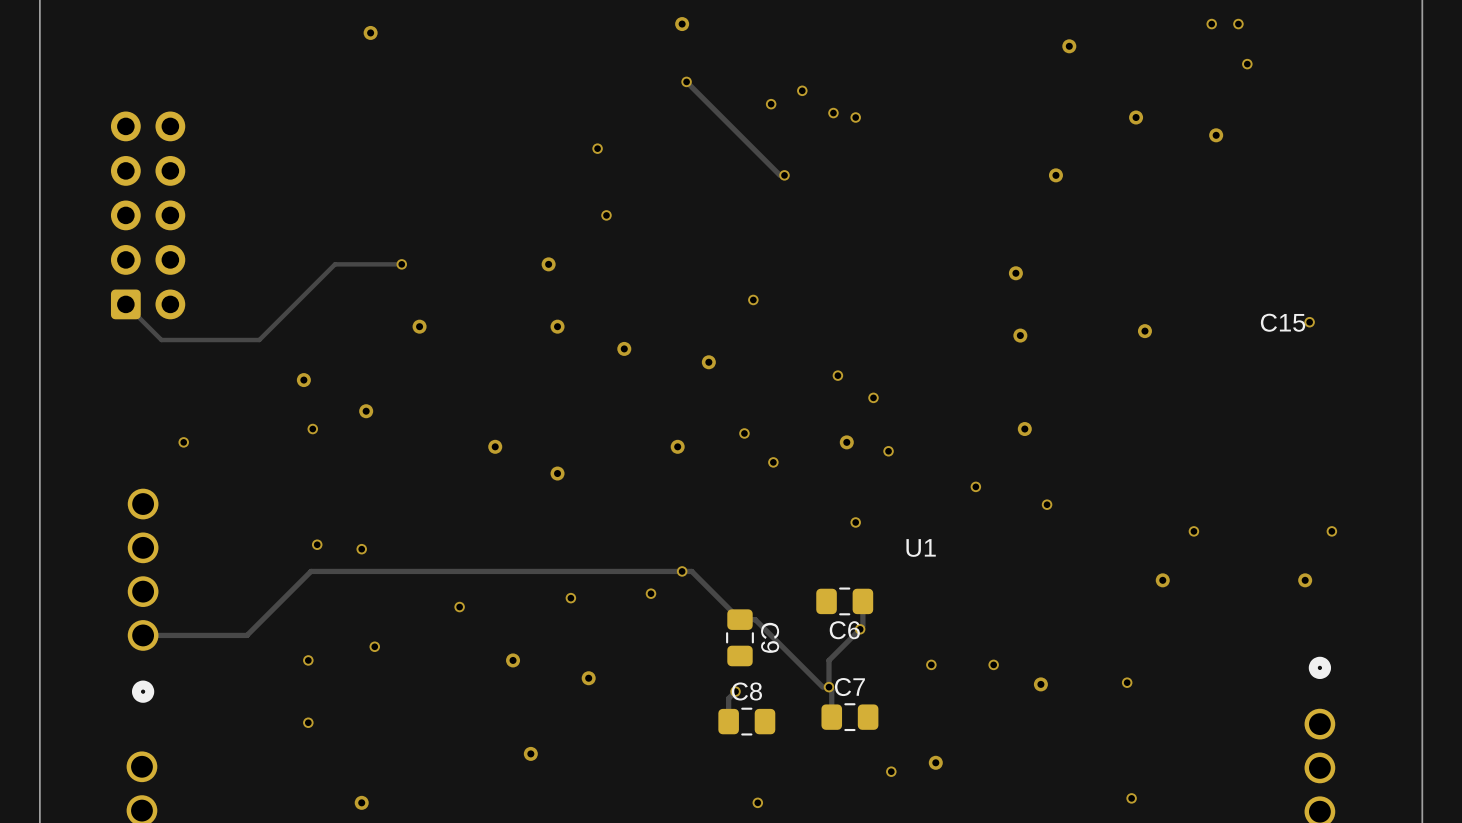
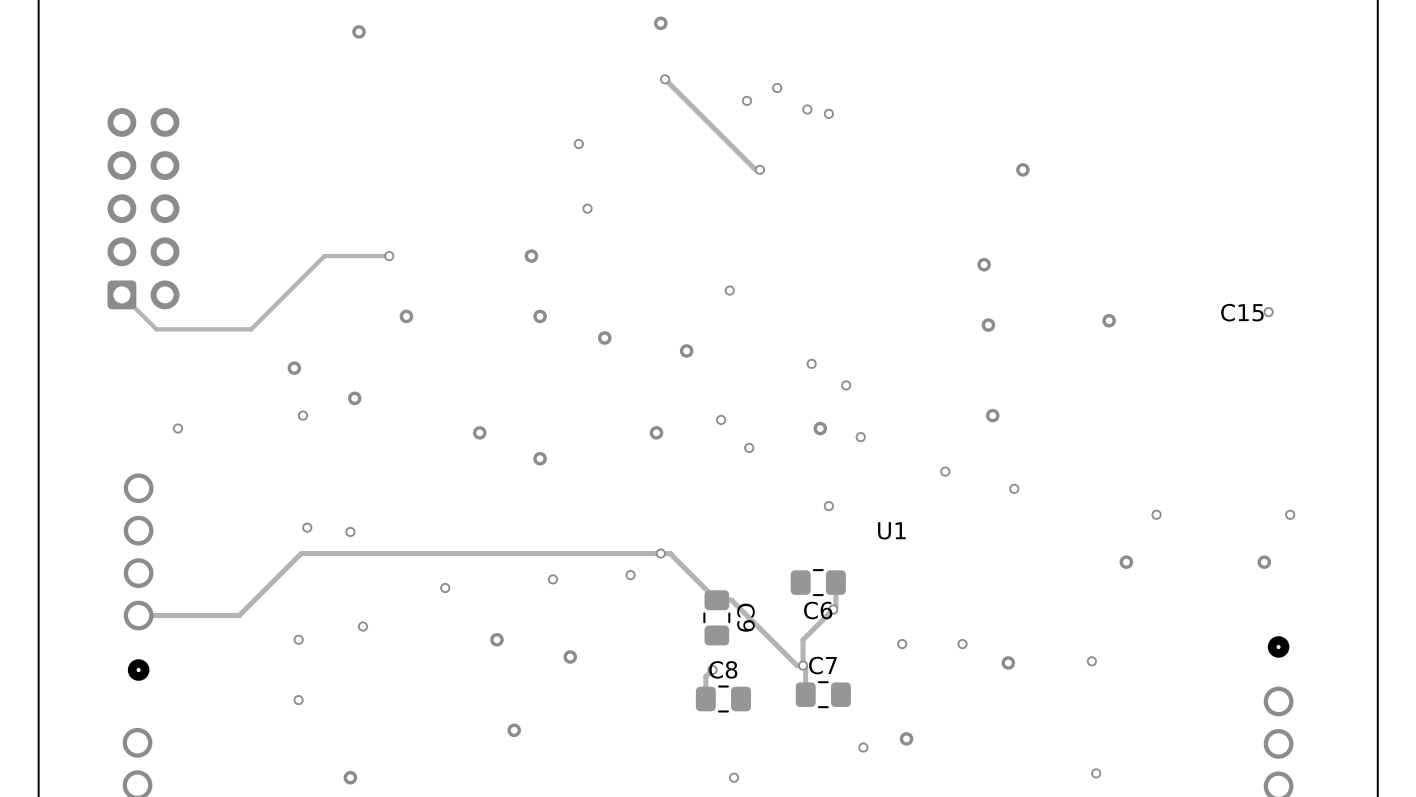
via: (1211, 24) -> none
via: (1238, 24) -> none
via: (1069, 46) -> none
via: (1247, 64) -> none
via: (1136, 117) -> none
via: (1216, 135) -> none

